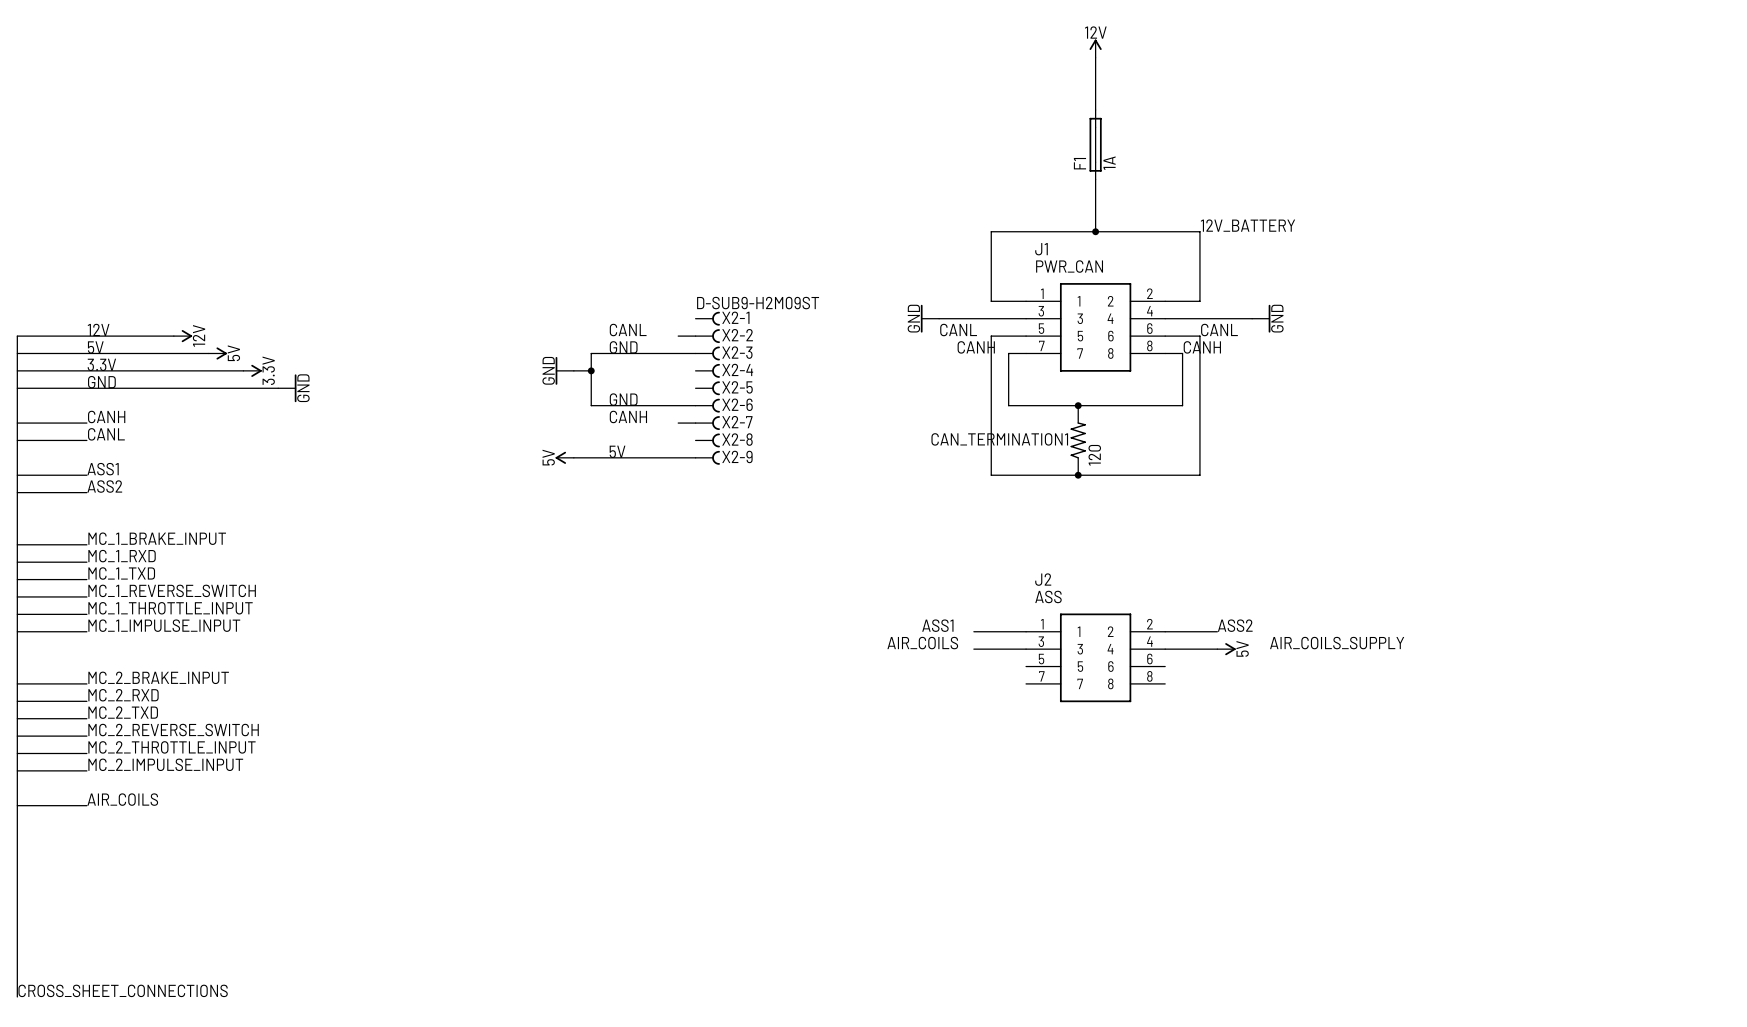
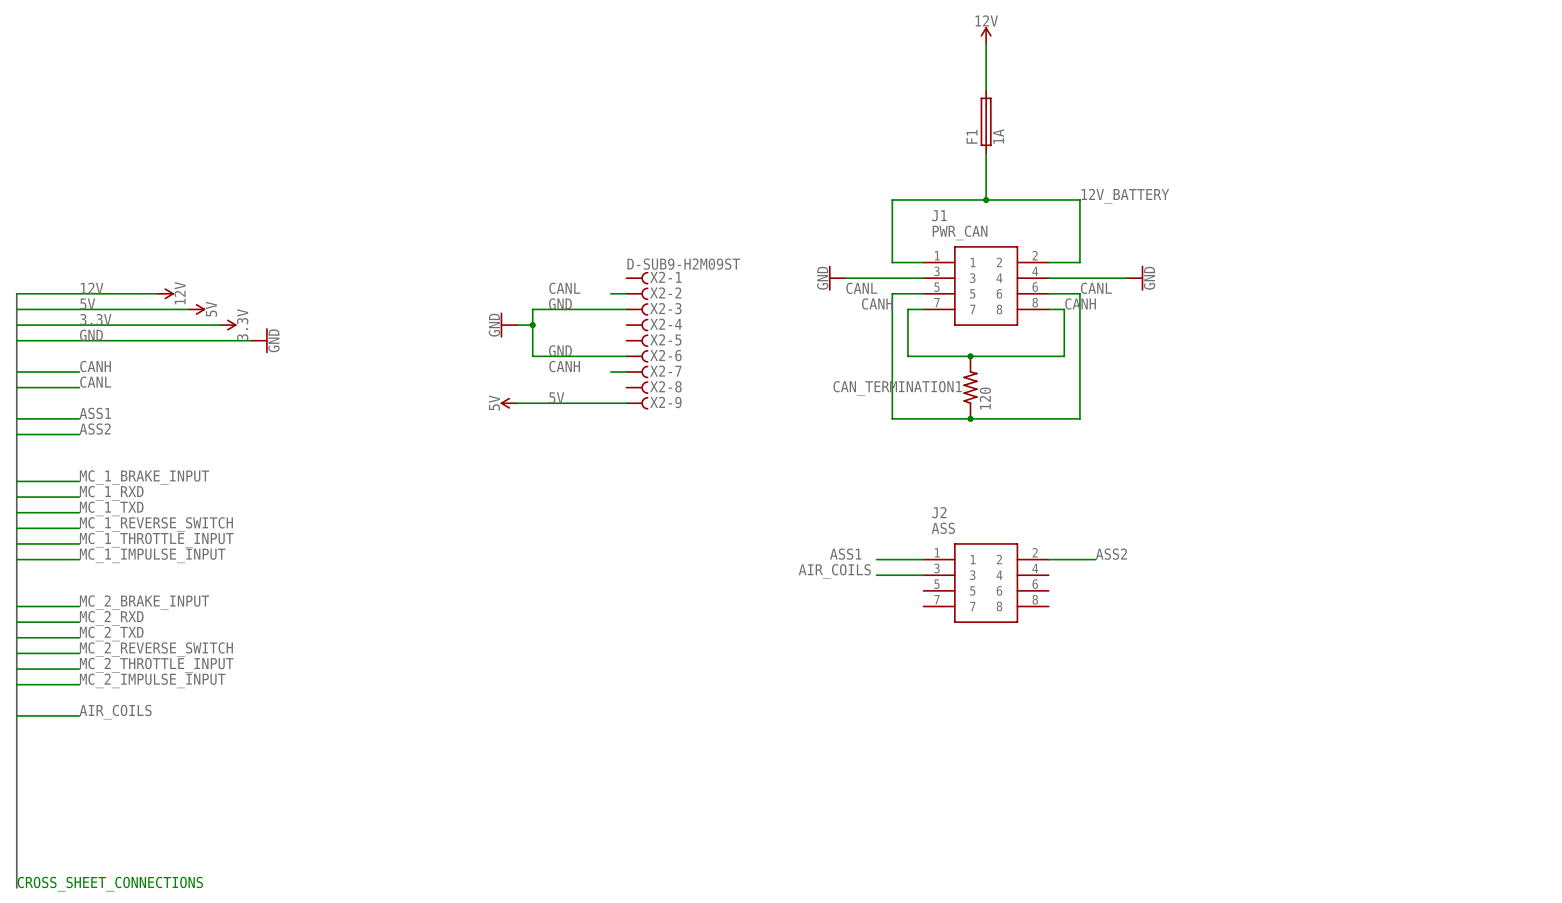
text: AIR_COILS_SUPPLY (1337, 643) -> none
wire: (1165, 649) (1217, 649) -> none
power symbol: 5V (1226, 649) -> none

